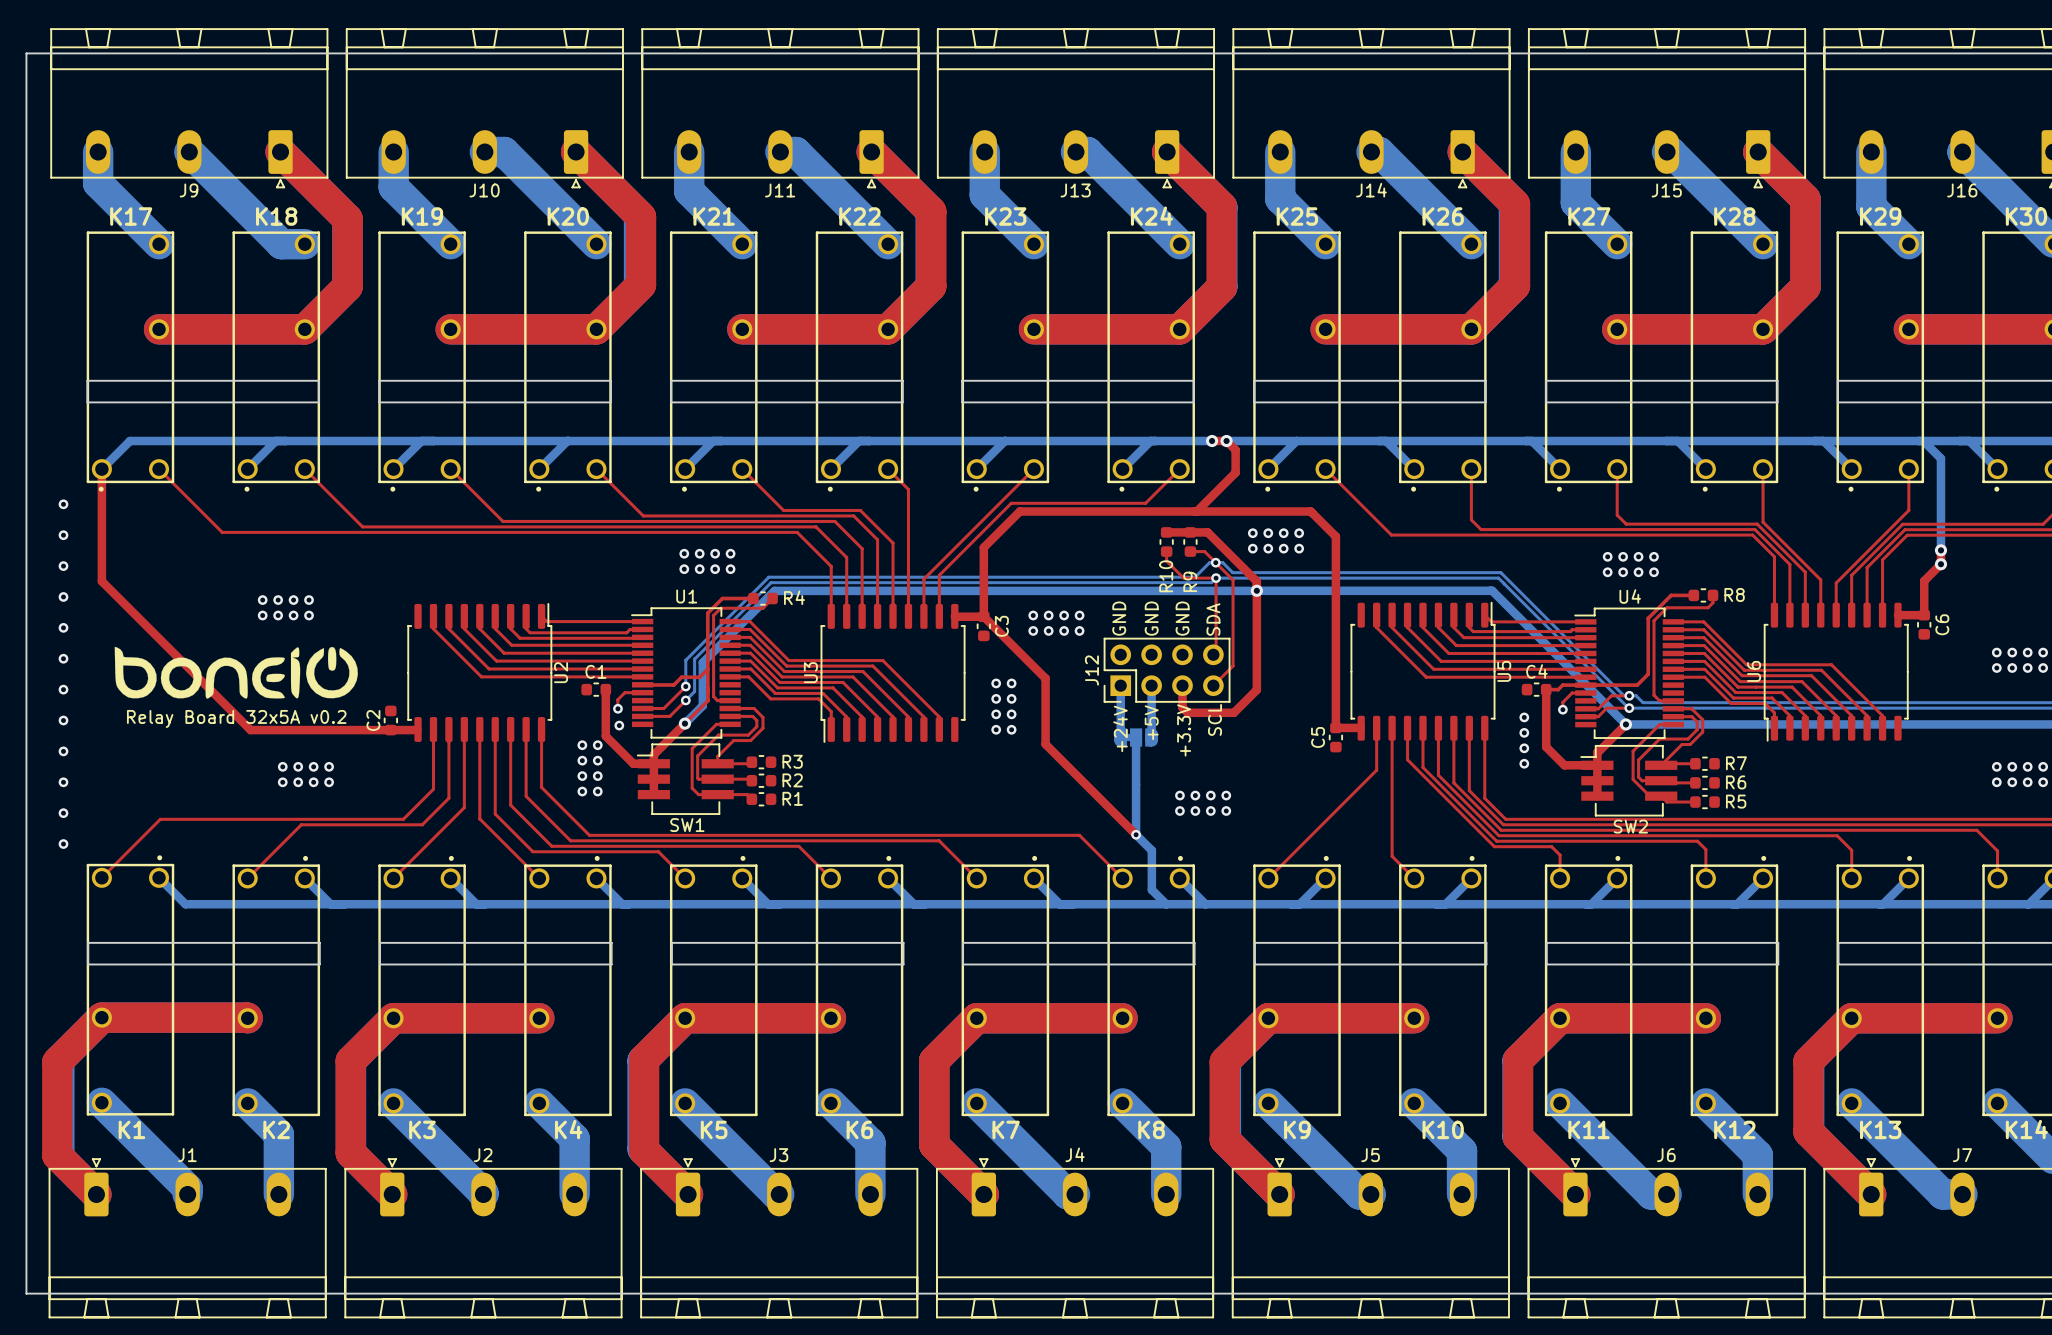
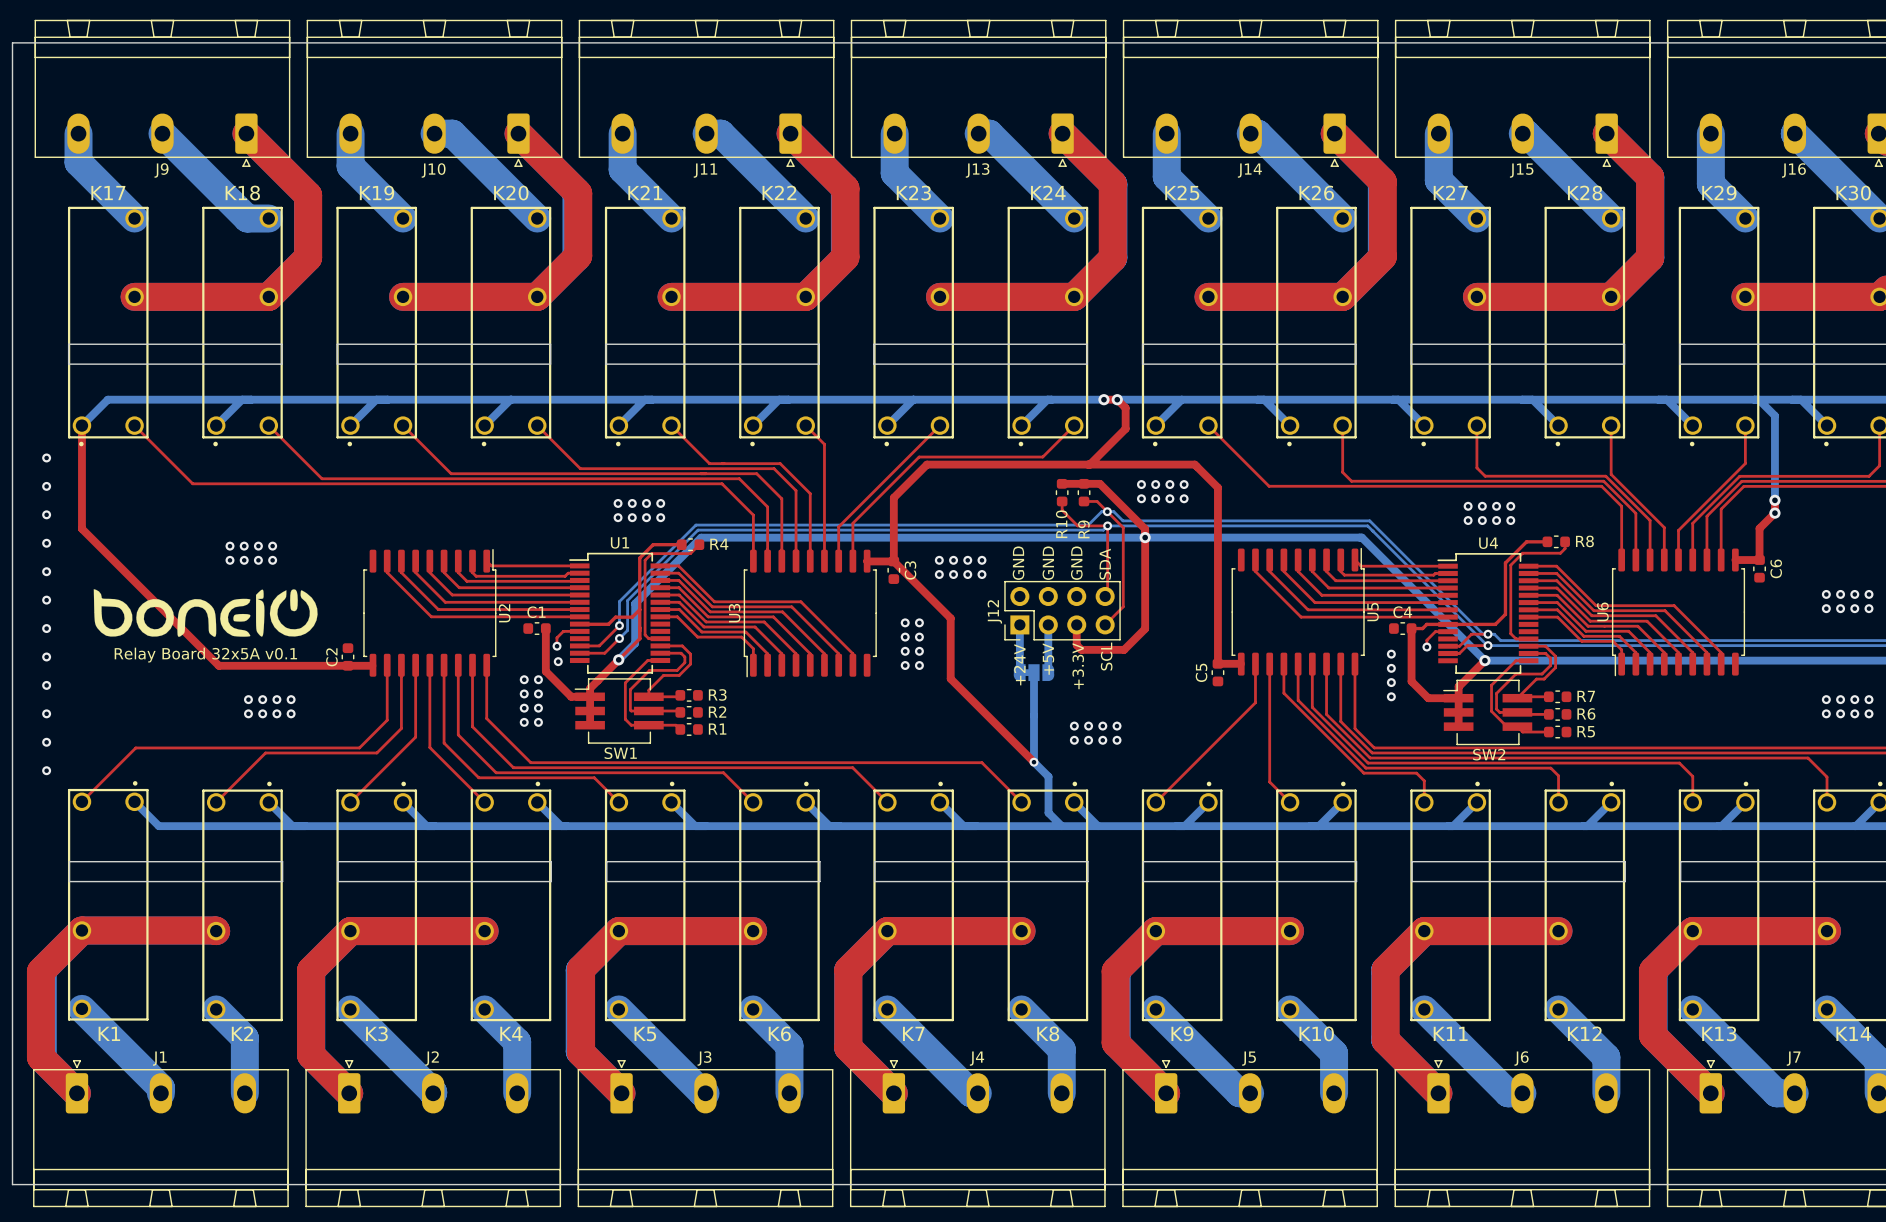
text: Relay Board 32x5A v0.2 (236, 718) -> Relay Board 32x5A v0.1 (205, 655)

